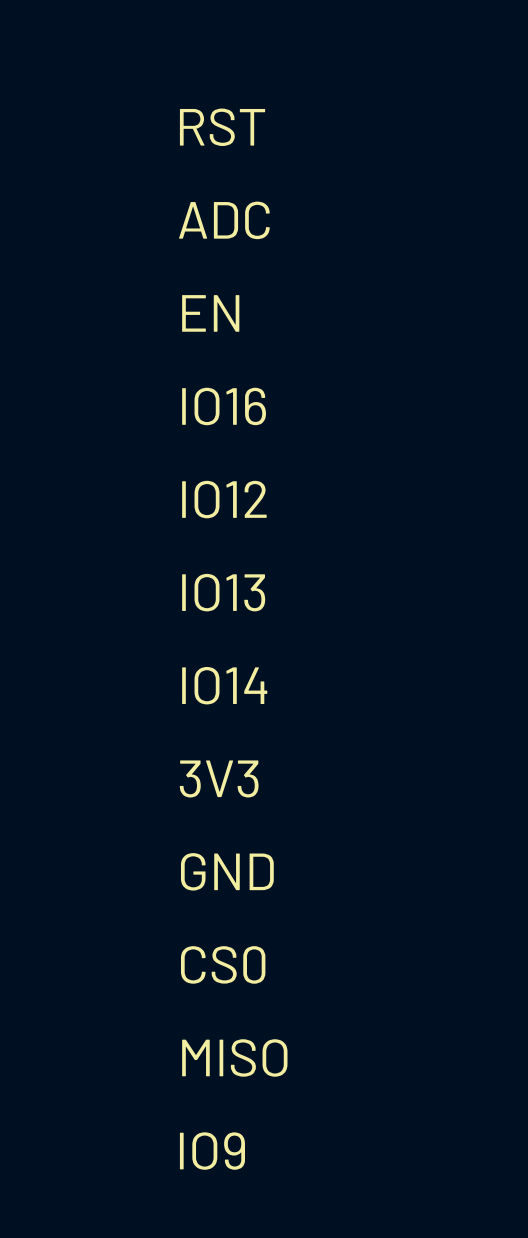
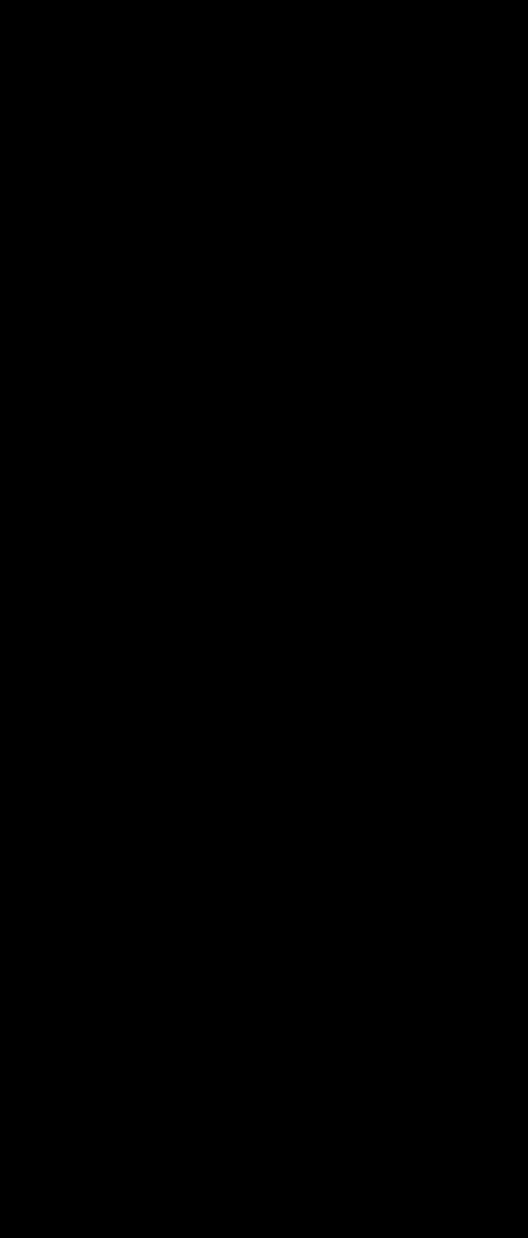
text: RST (222, 127) -> none
text: ADC (224, 220) -> none
text: EN (210, 313) -> none
text: IO16 (224, 406) -> none
text: IO12 (224, 499) -> none
text: IO13 (223, 592) -> none
text: IO14 (224, 685) -> none
text: 3V3 (219, 778) -> none
text: GND (227, 871) -> none
text: CS0 (223, 964) -> none
text: MISO (234, 1057) -> none
text: IO9 (212, 1151) -> none

